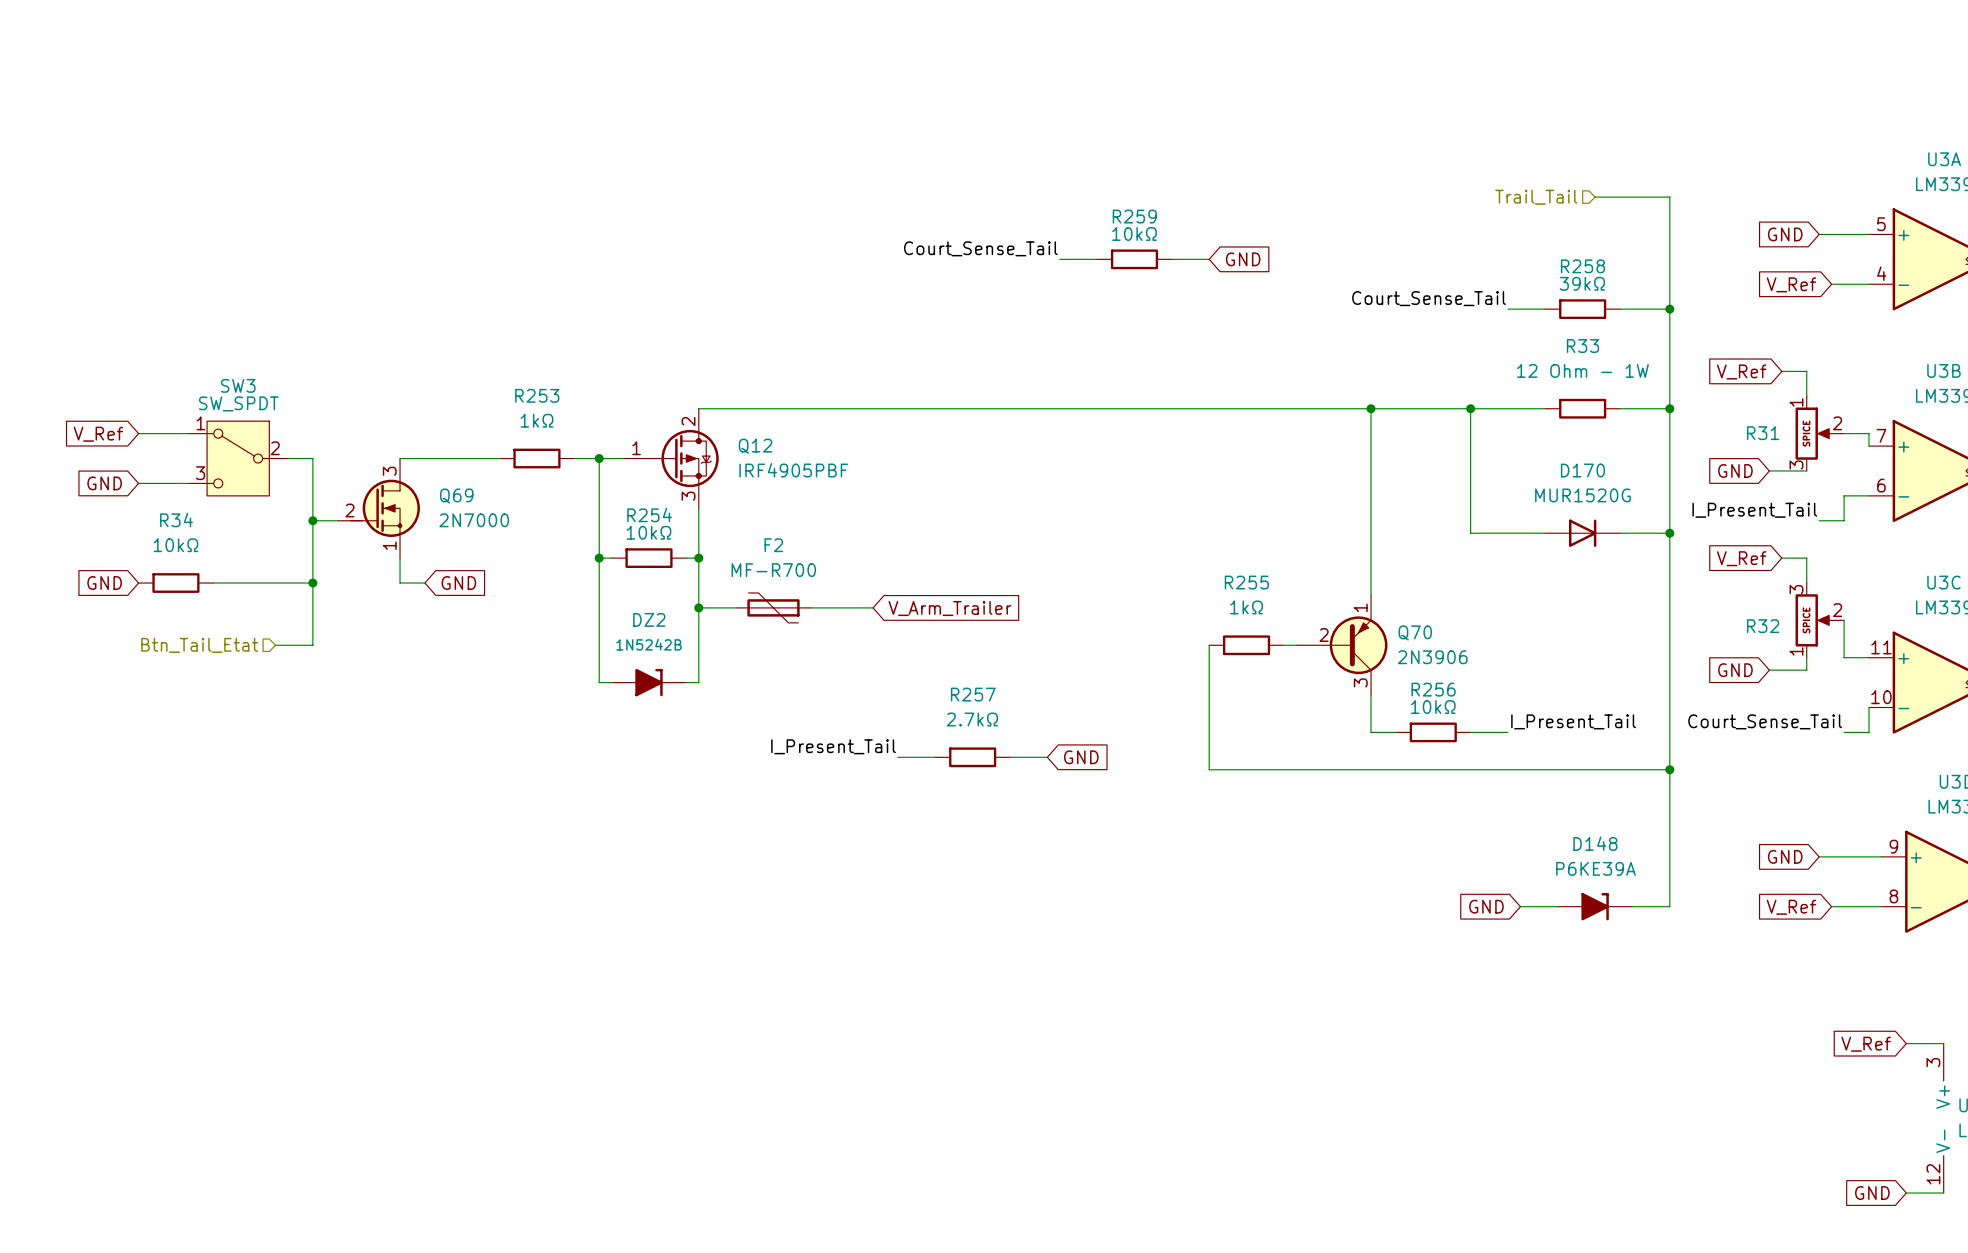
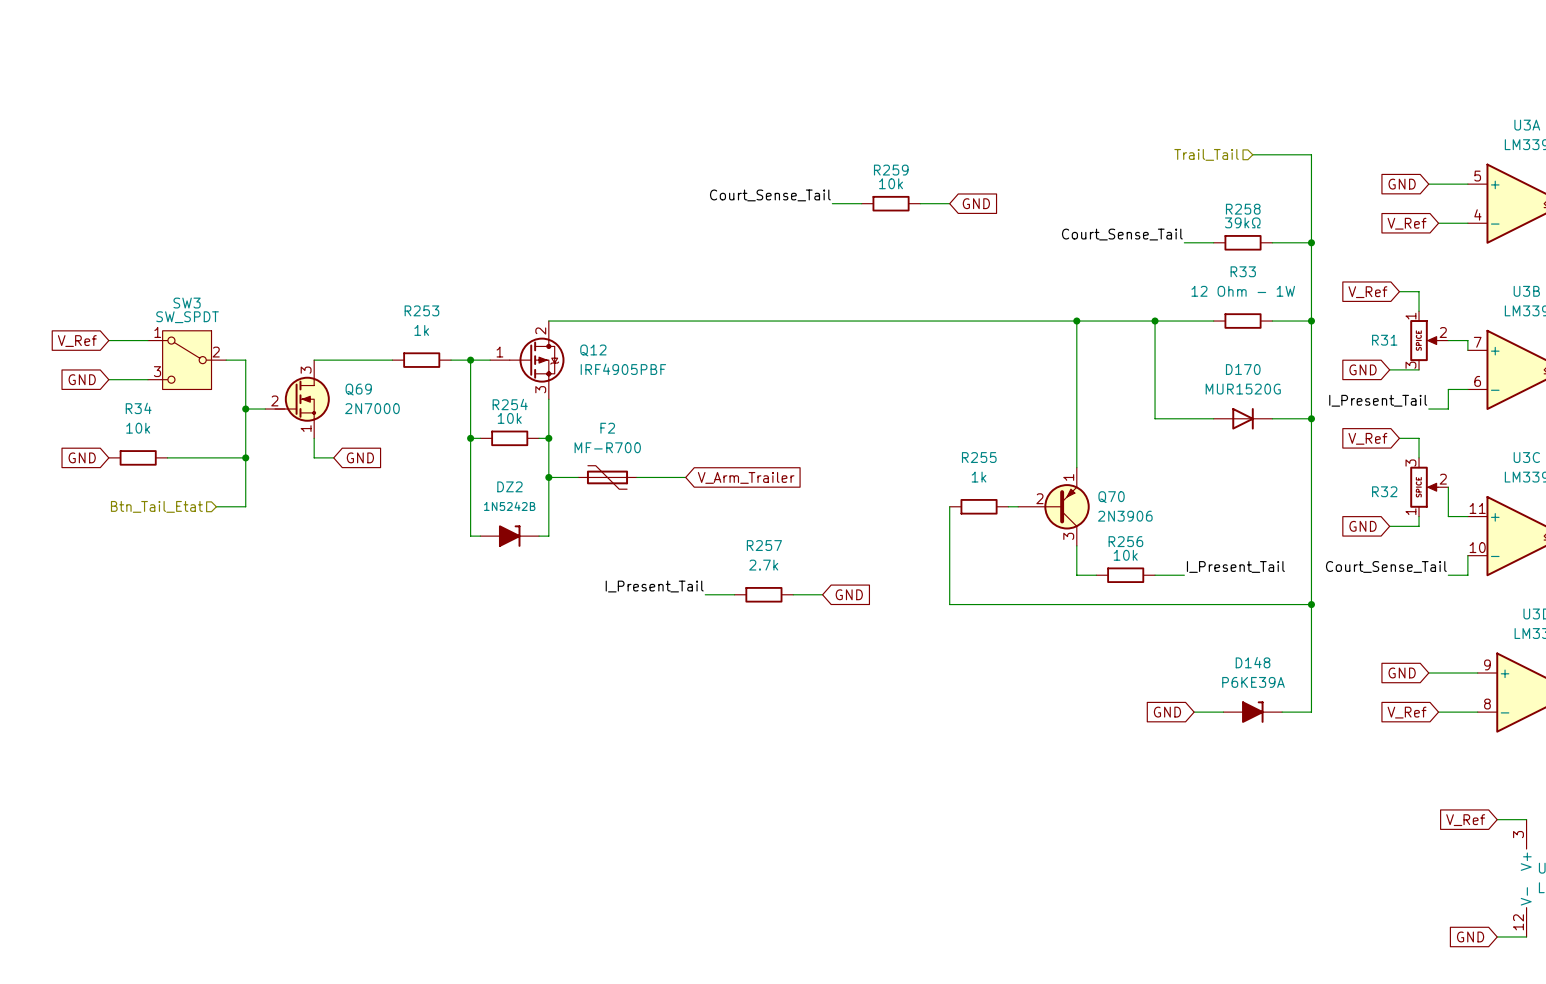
R259 value: 10kΩ (1134, 233) -> 10k (891, 183)
R253 value: 1kΩ (536, 420) -> 1k (421, 330)
R254 value: 10kΩ (648, 532) -> 10k (509, 418)
R34 value: 10kΩ (175, 545) -> 10k (138, 428)
R255 value: 1kΩ (1246, 607) -> 1k (979, 477)
R256 value: 10kΩ (1433, 707) -> 10k (1125, 555)
R257 value: 2.7kΩ (972, 719) -> 2.7k (763, 565)

